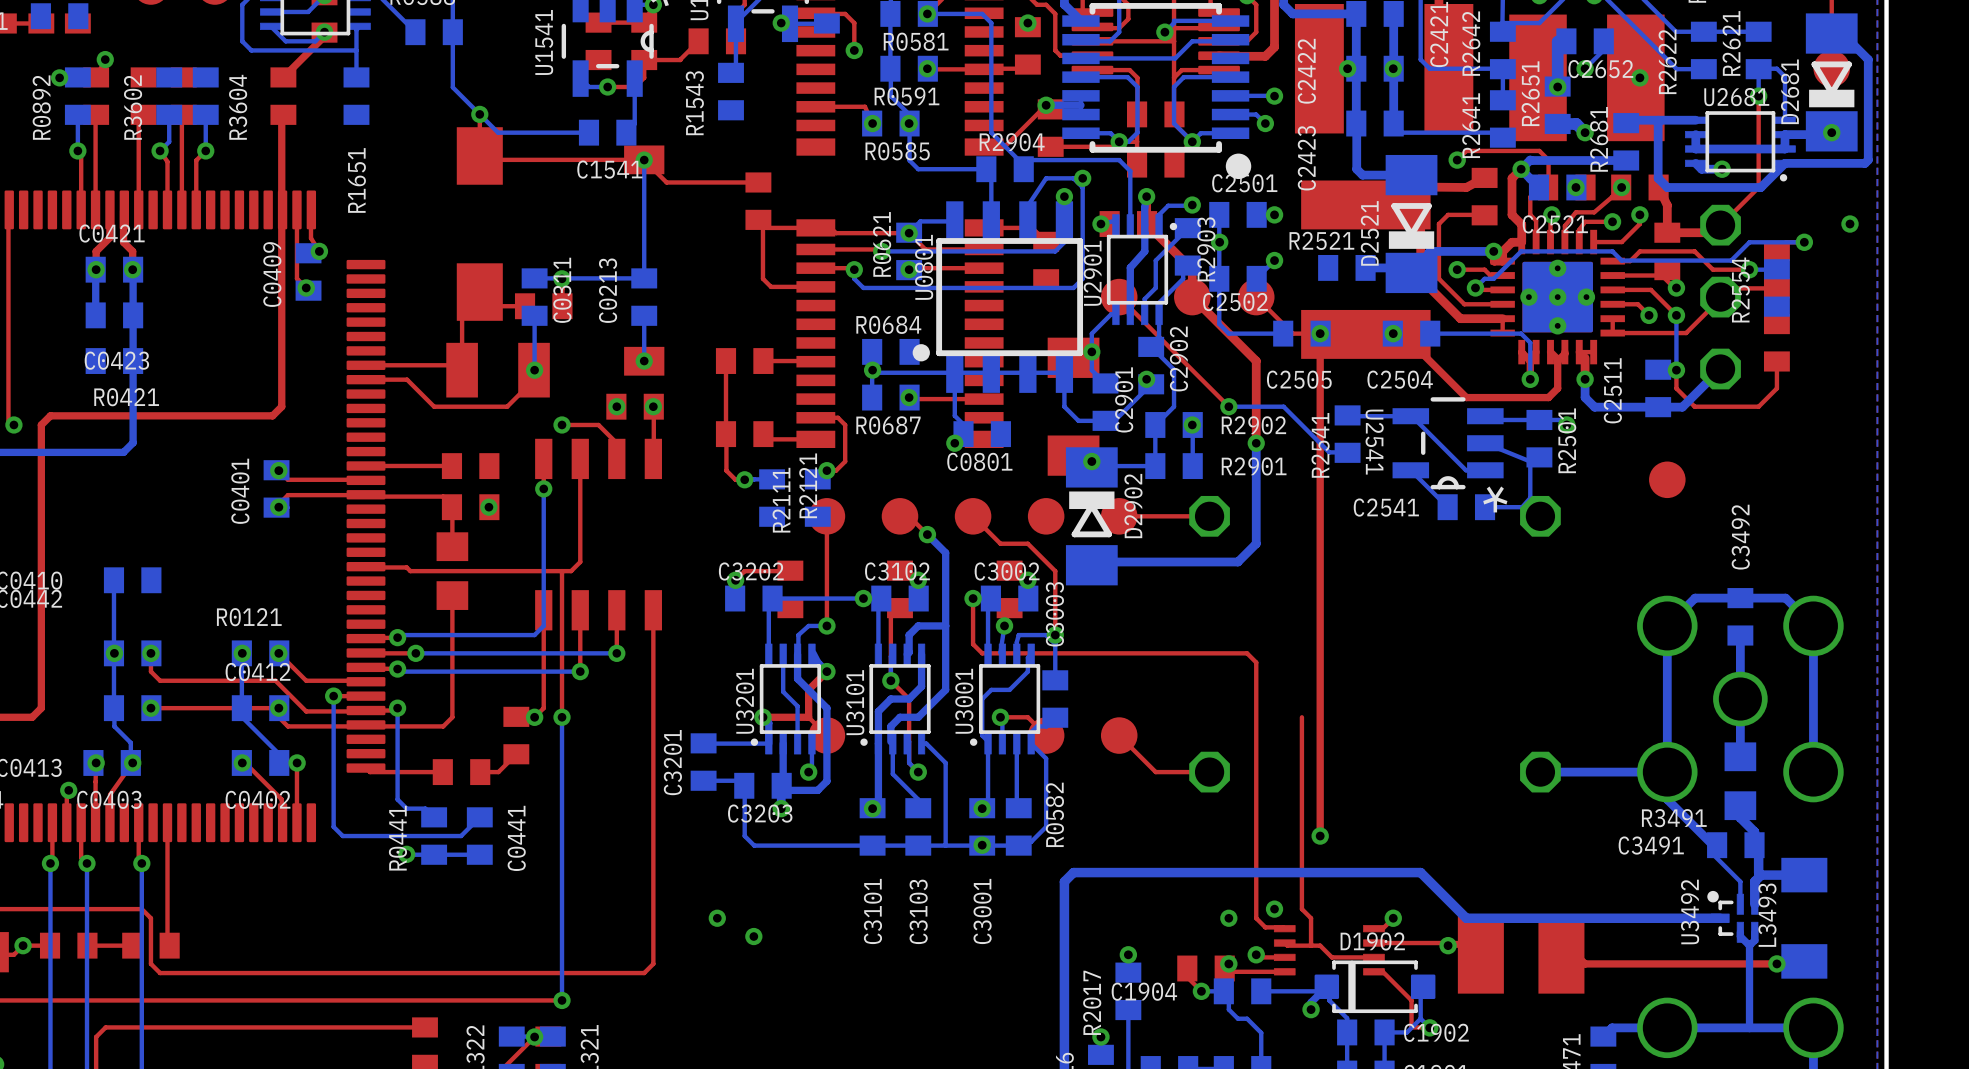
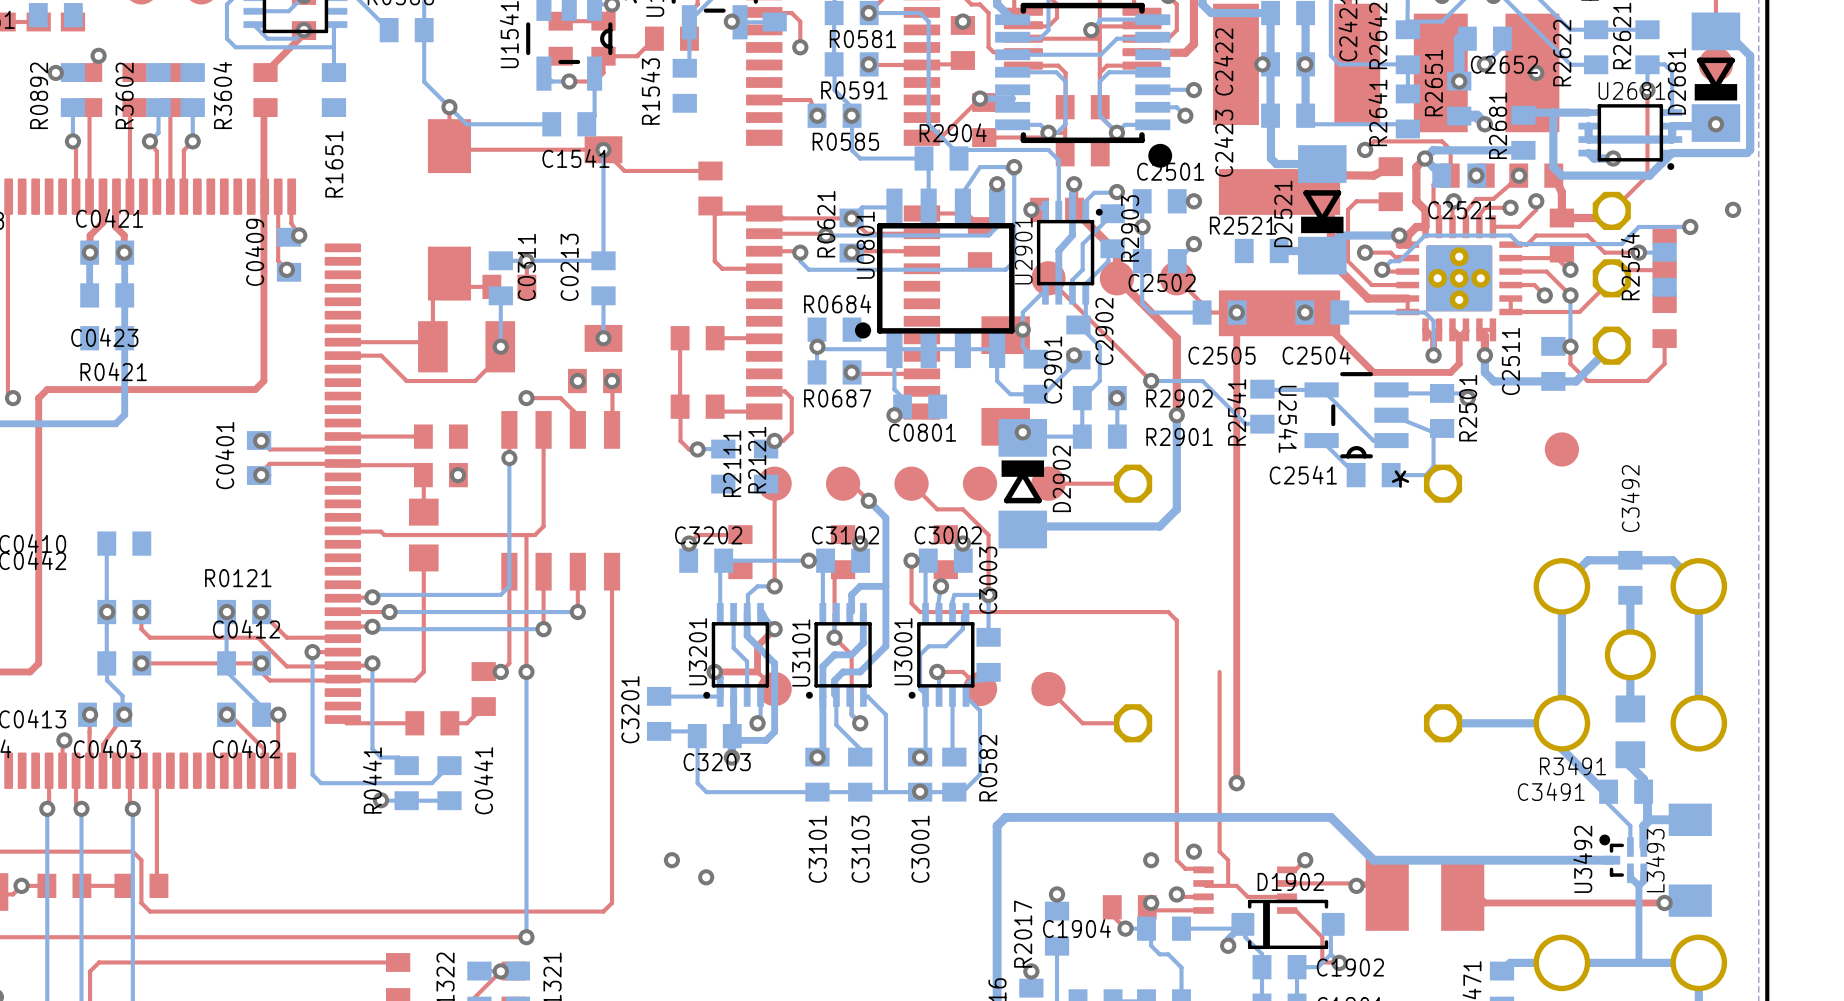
part footprint: [1490, 229, 1625, 365] -> [1396, 215, 1523, 342]

